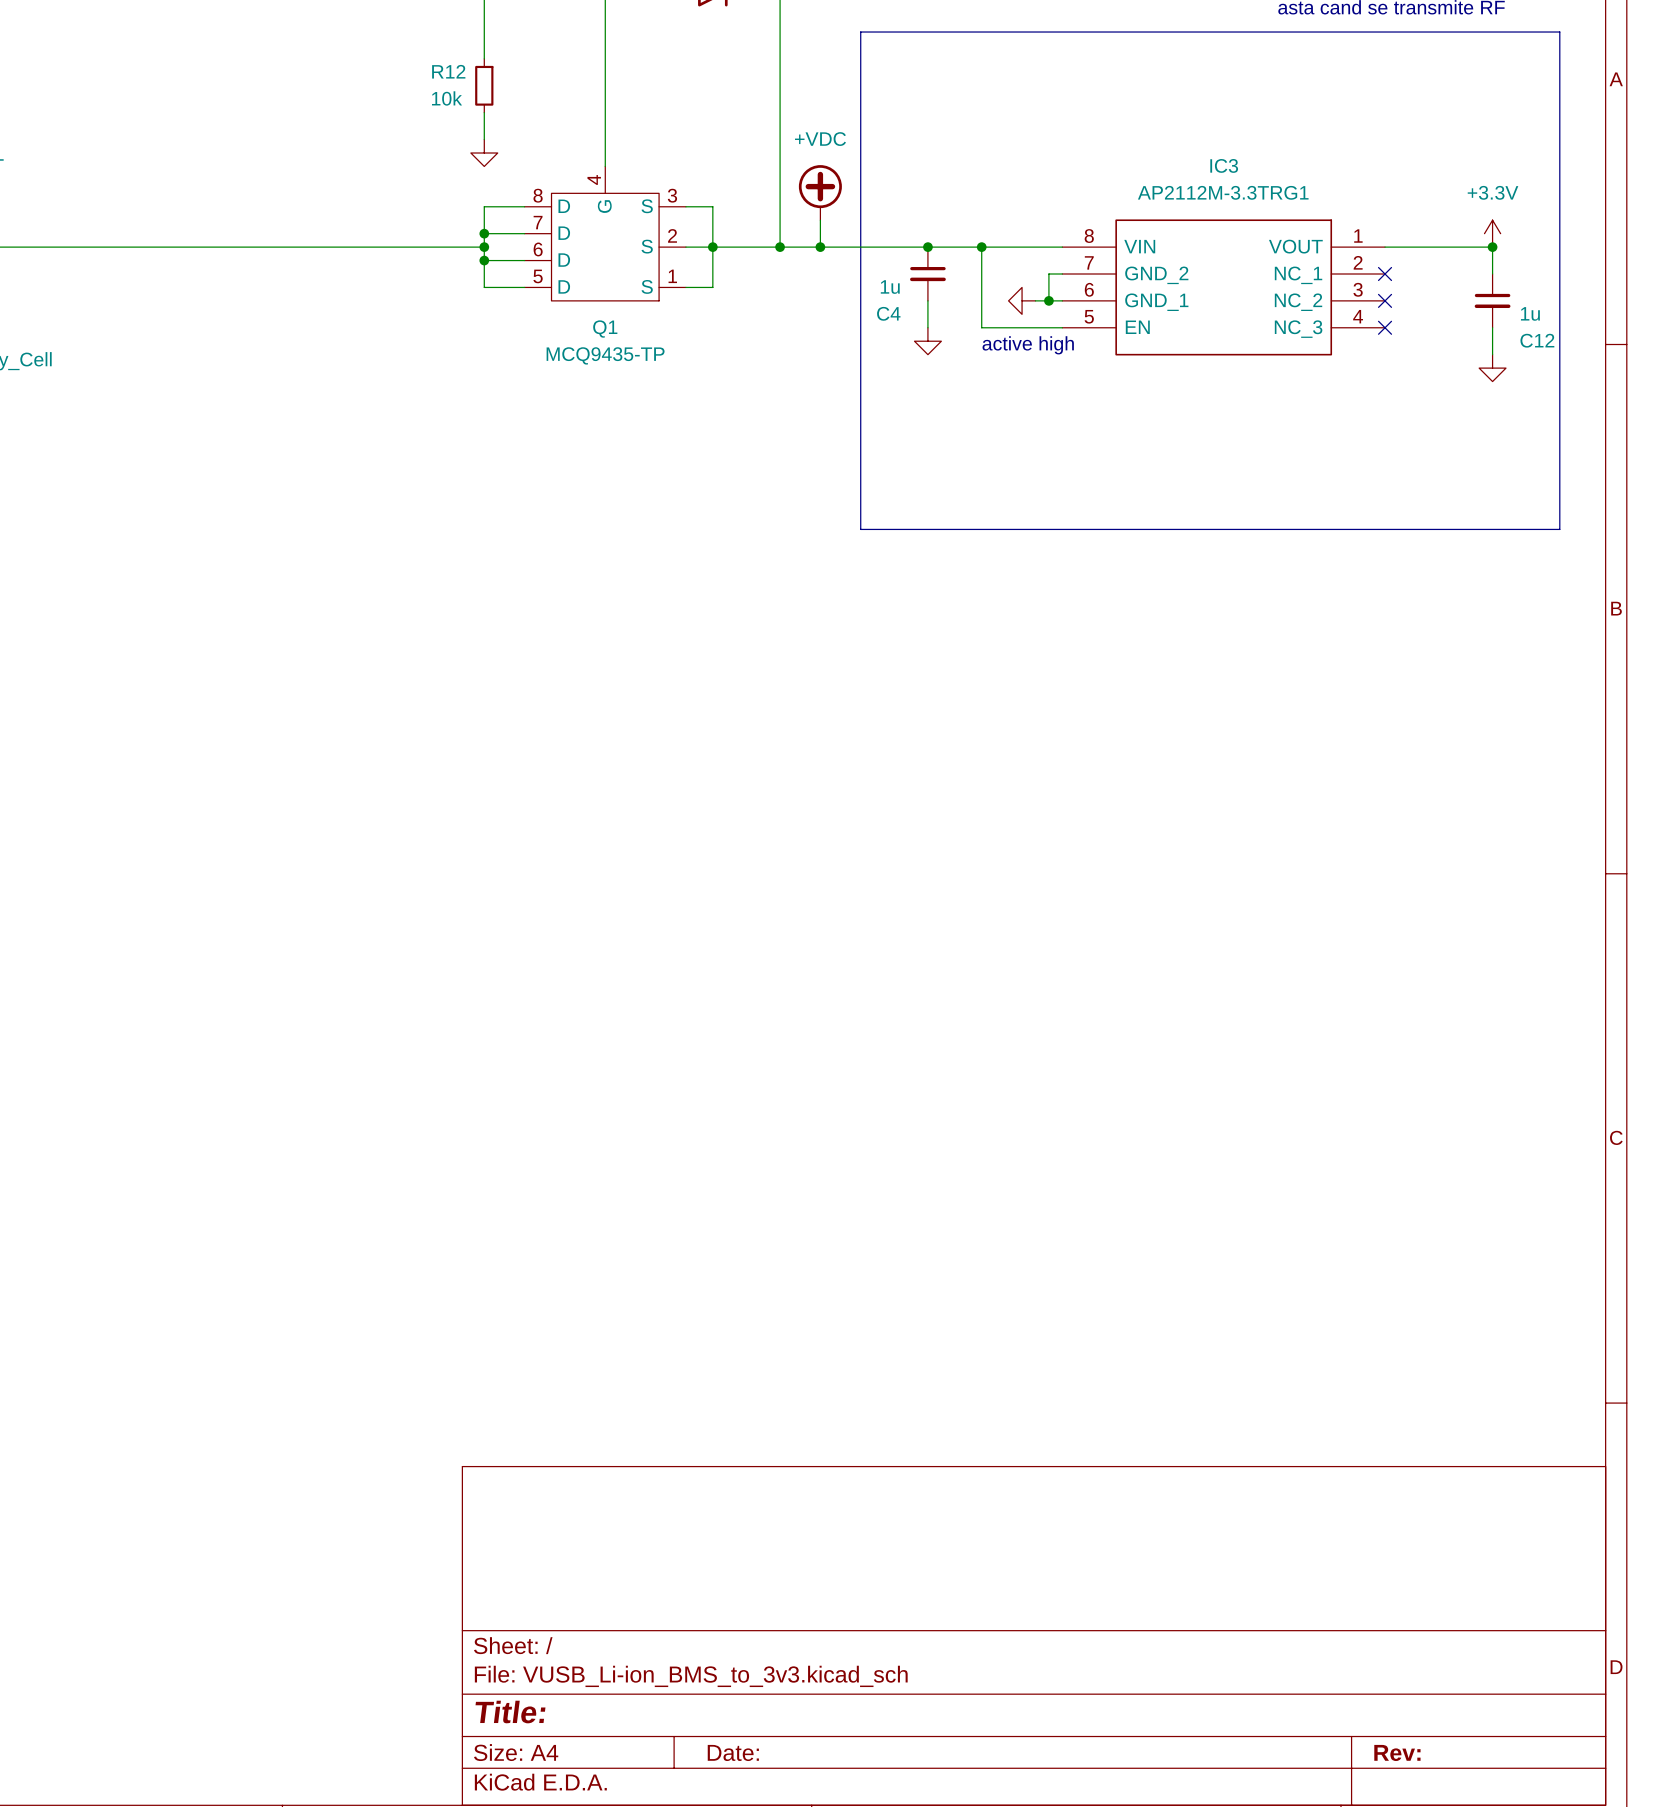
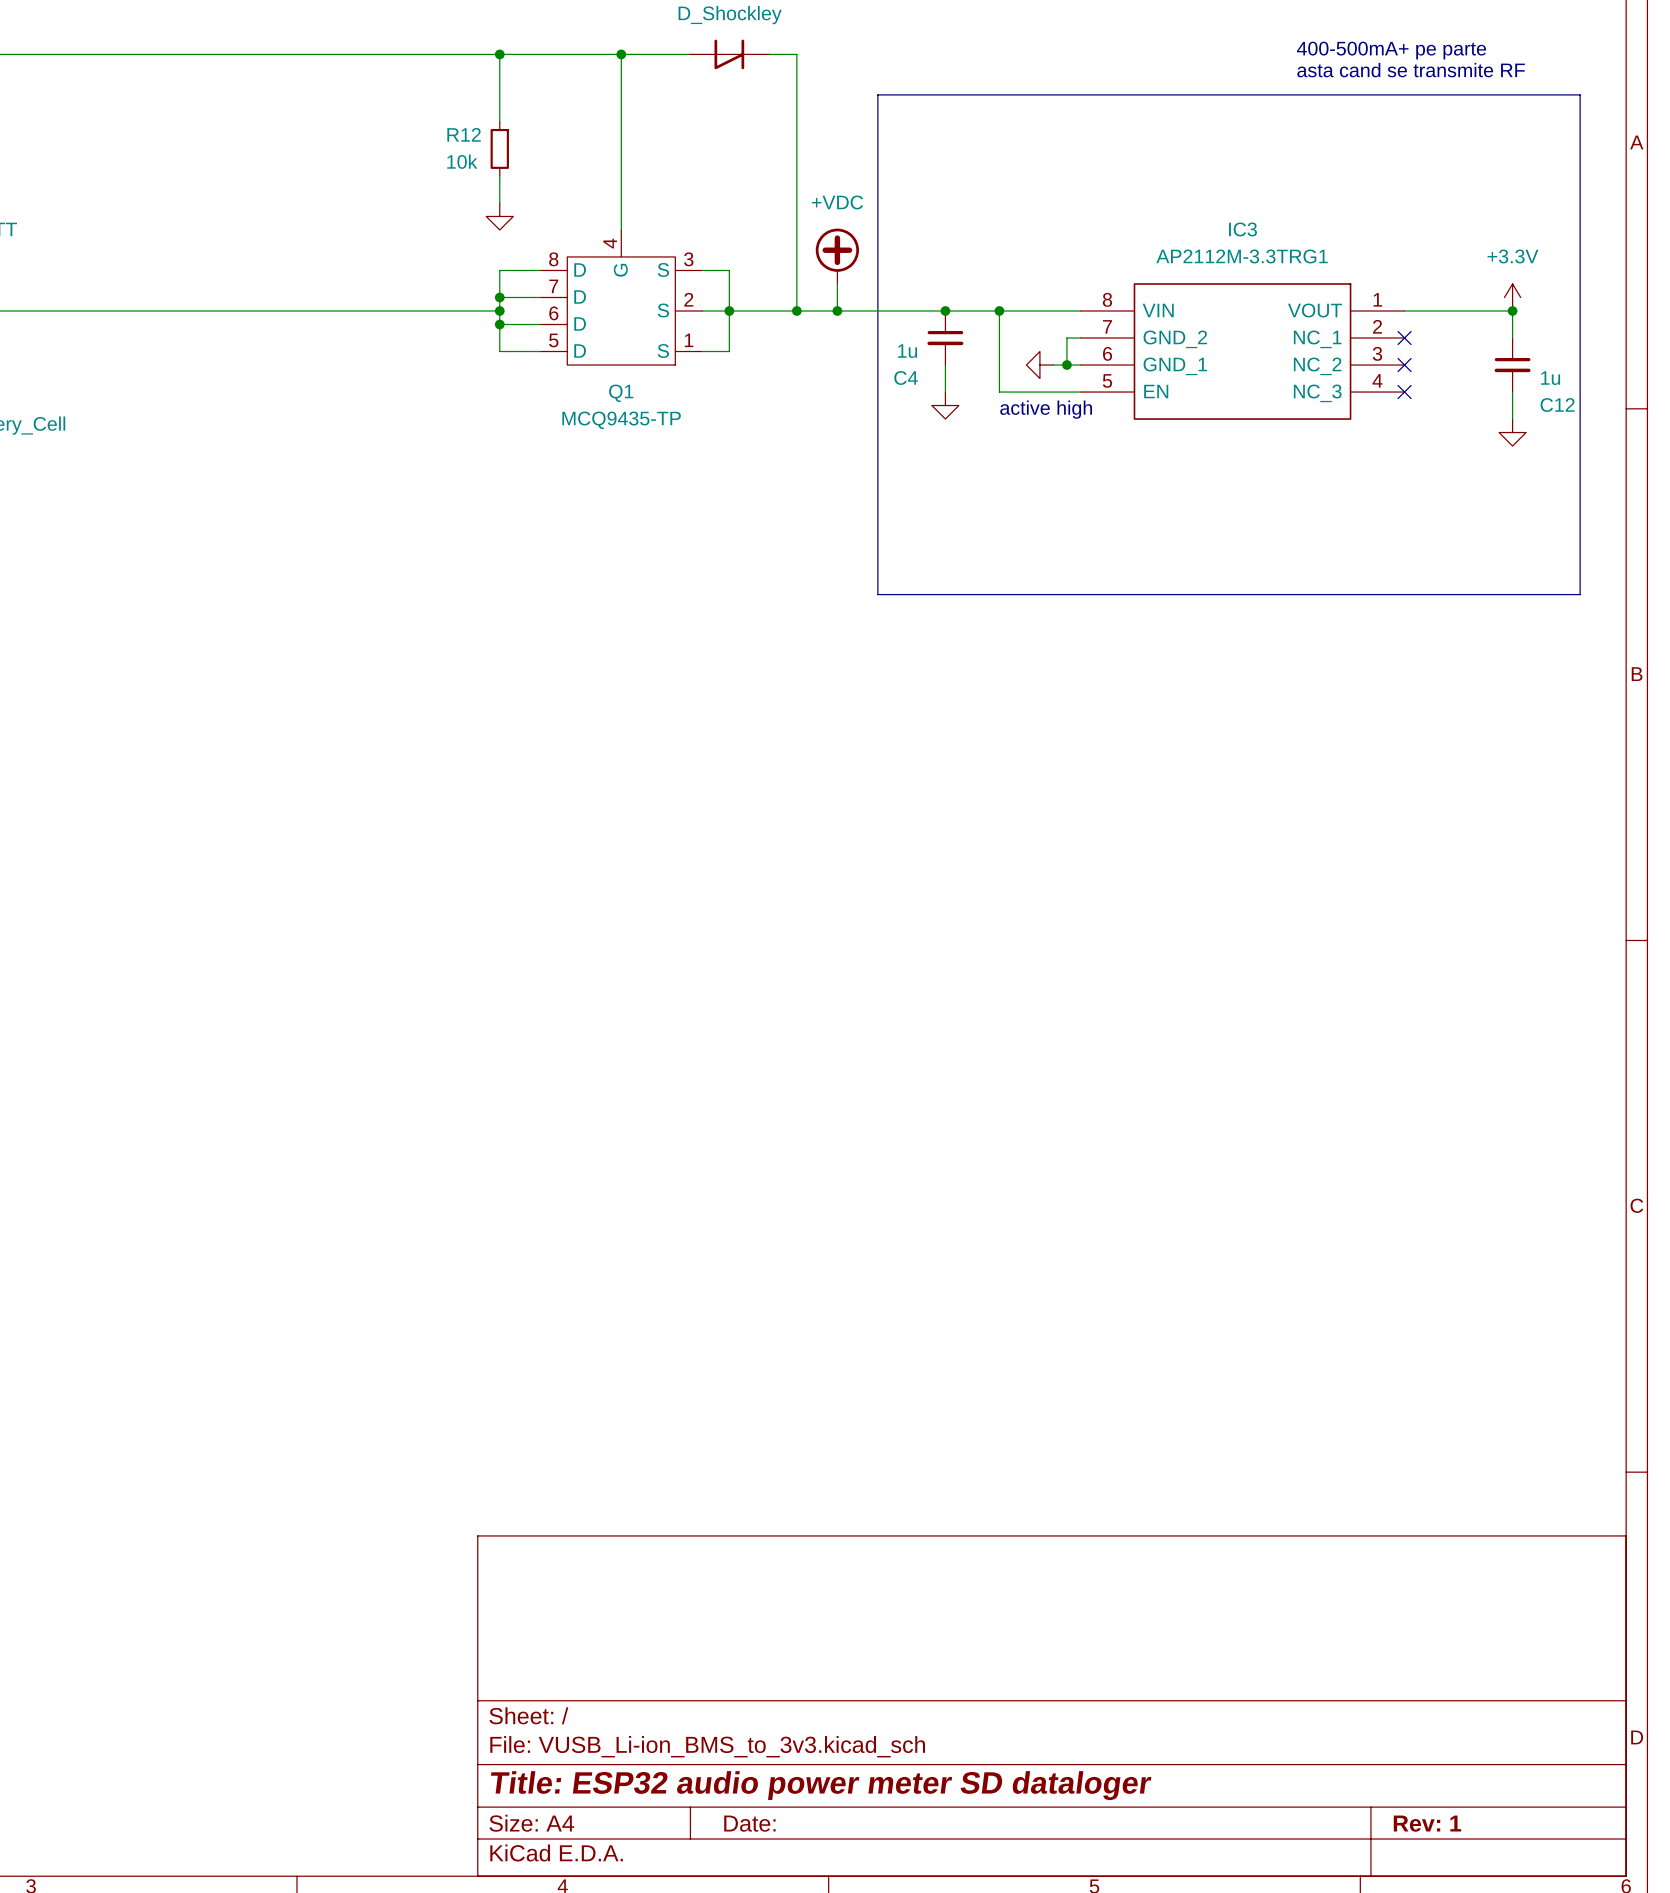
title block: Title: (510, 1712) -> Title: ESP32 audio power meter SD dataloger (821, 1785)
title block: Rev: (1397, 1752) -> Rev: 1 (1427, 1823)

